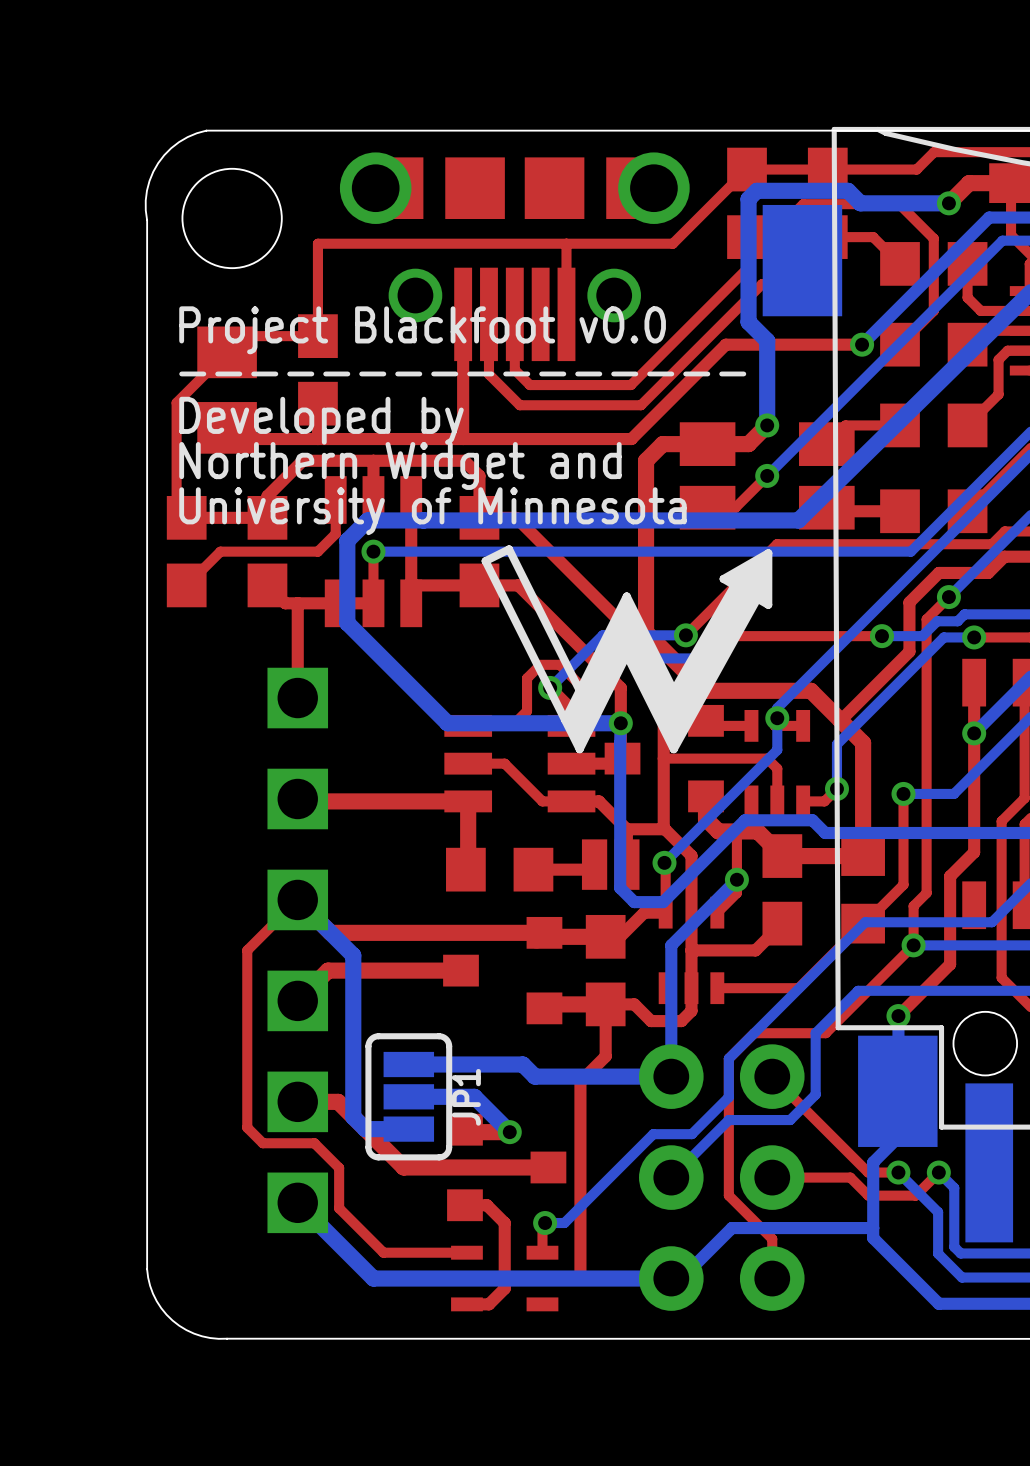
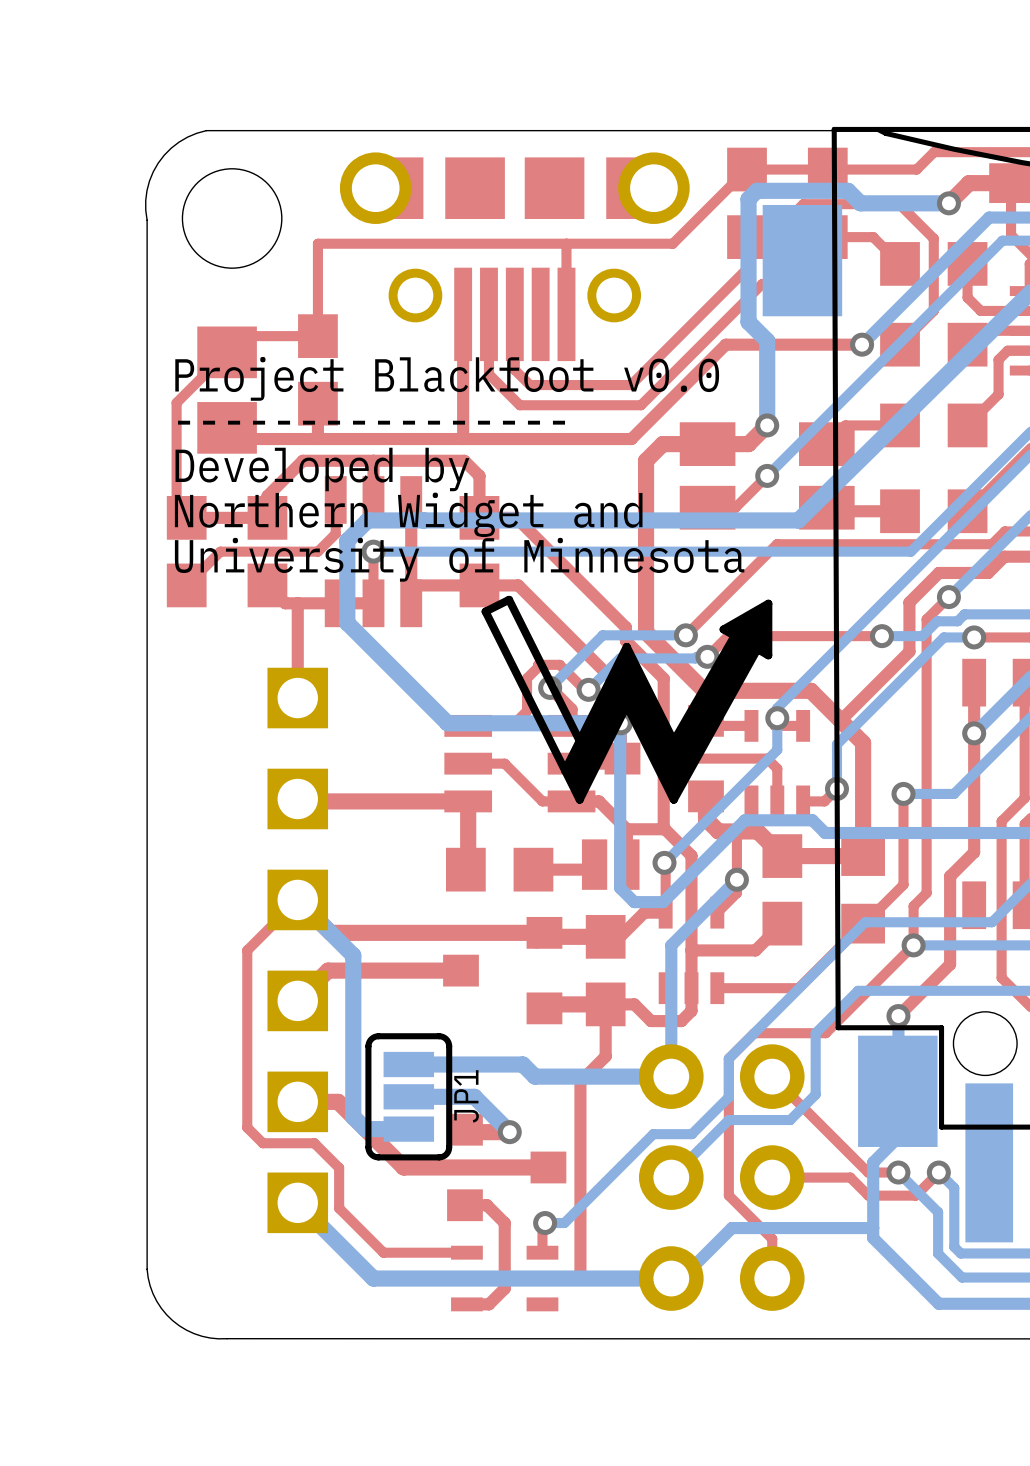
text: Project Blackfoot v0.0 (422, 330) -> none
text: ---------------- (462, 373) -> Project Blackfoot v0.0 (447, 378)
text: Developed by (321, 420) -> ---------------- (371, 422)
text: Northern Widget and (400, 465) -> Developed by (322, 469)
text: University of Minnesota (432, 511) -> Northern Widget and (408, 514)
text: none -> University of Minnesota (459, 559)
drawing position: (626, 649) -> (626, 699)

